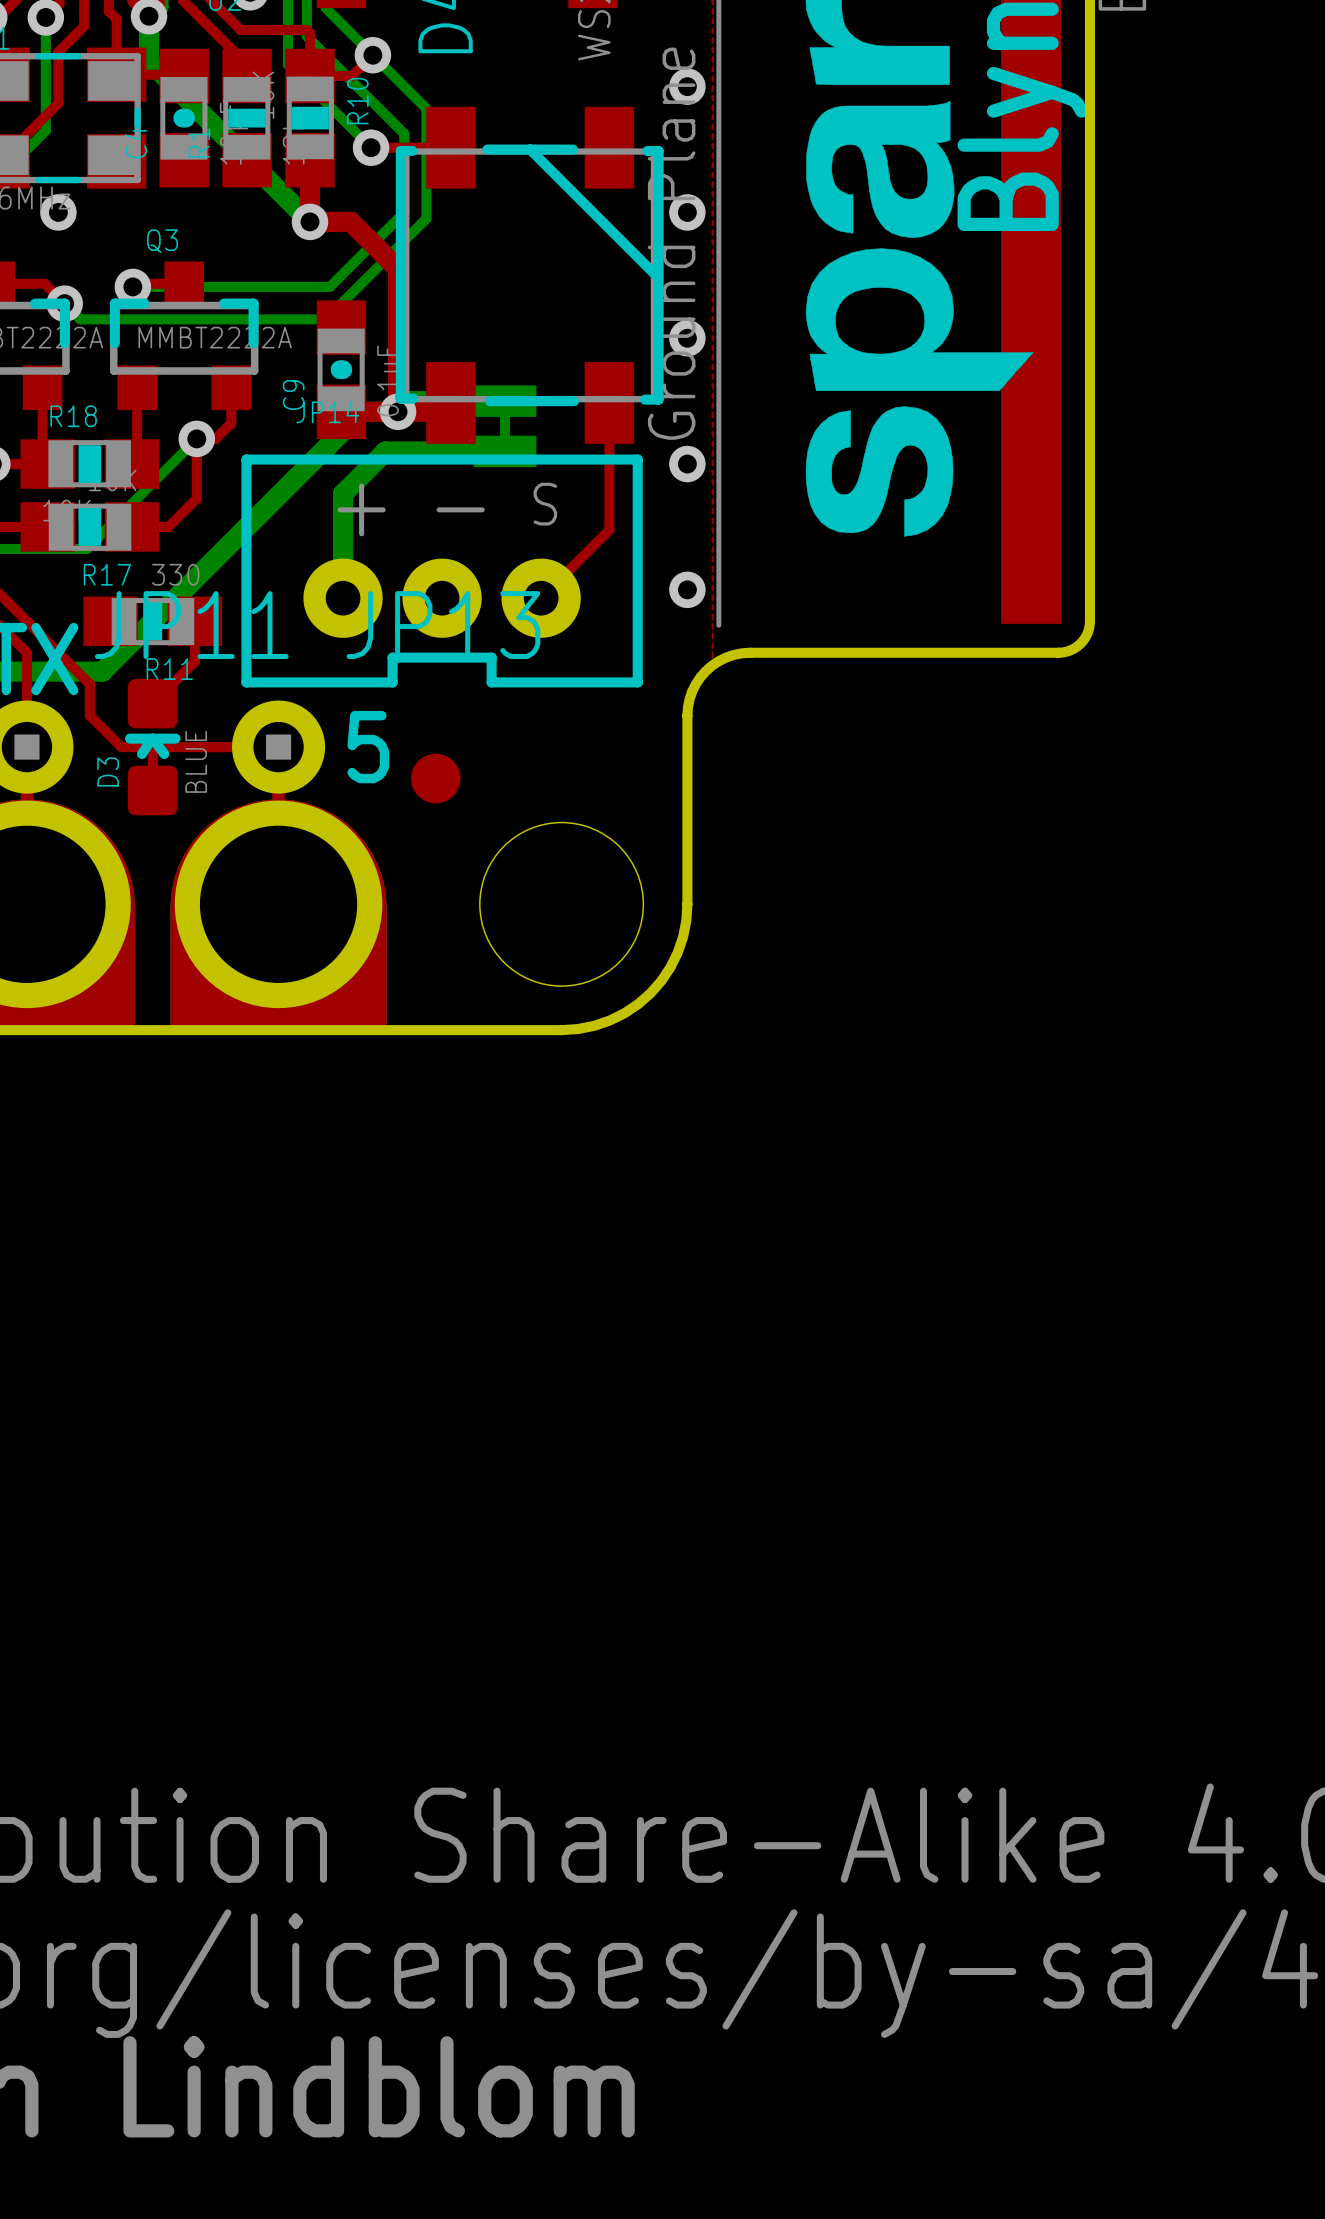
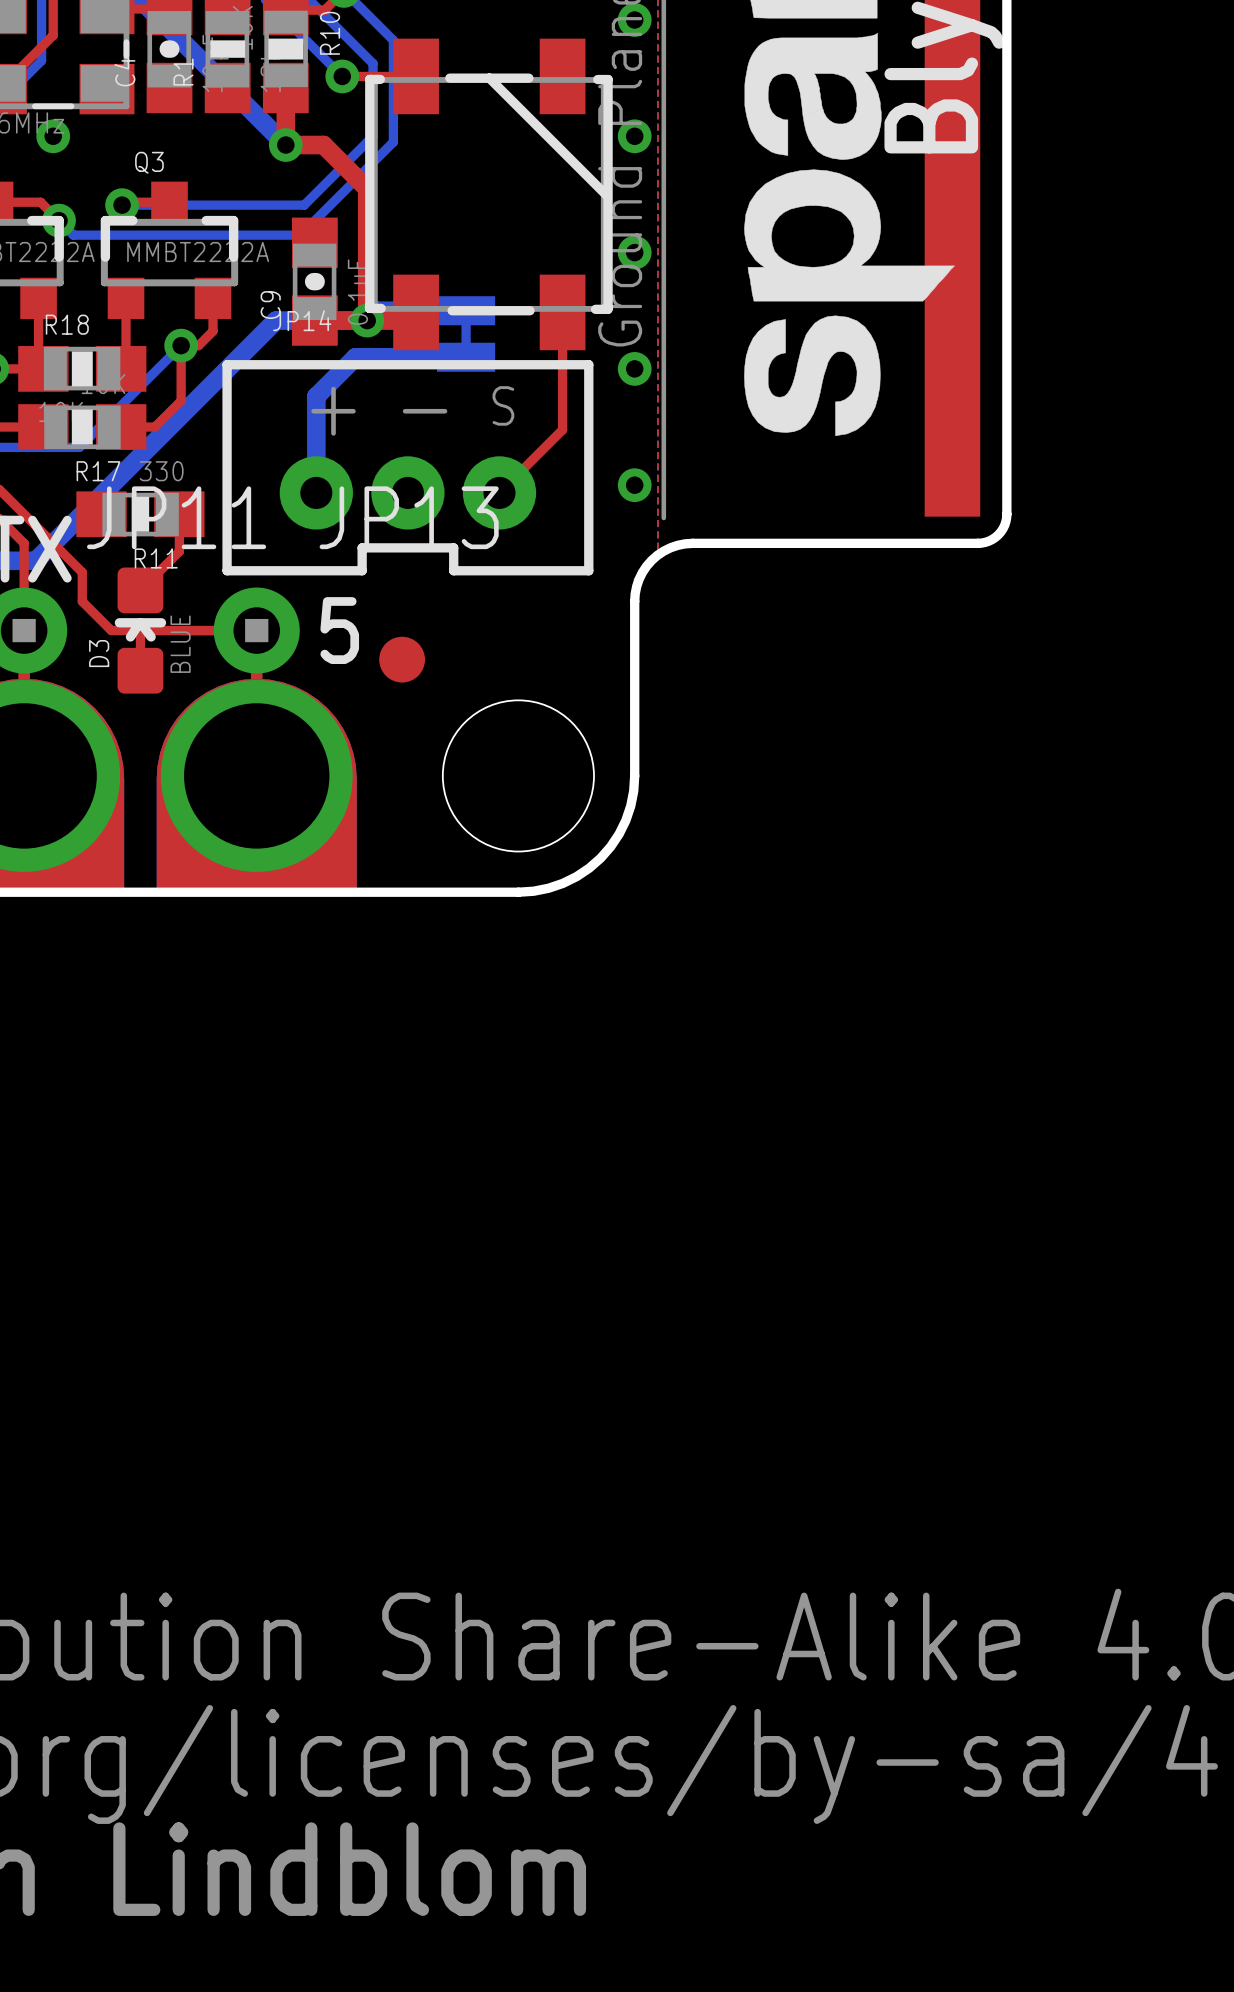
bottom track: (362, 411) (102, 671) (39, 671) -> (334, 320) (275, 320) (35, 560)

